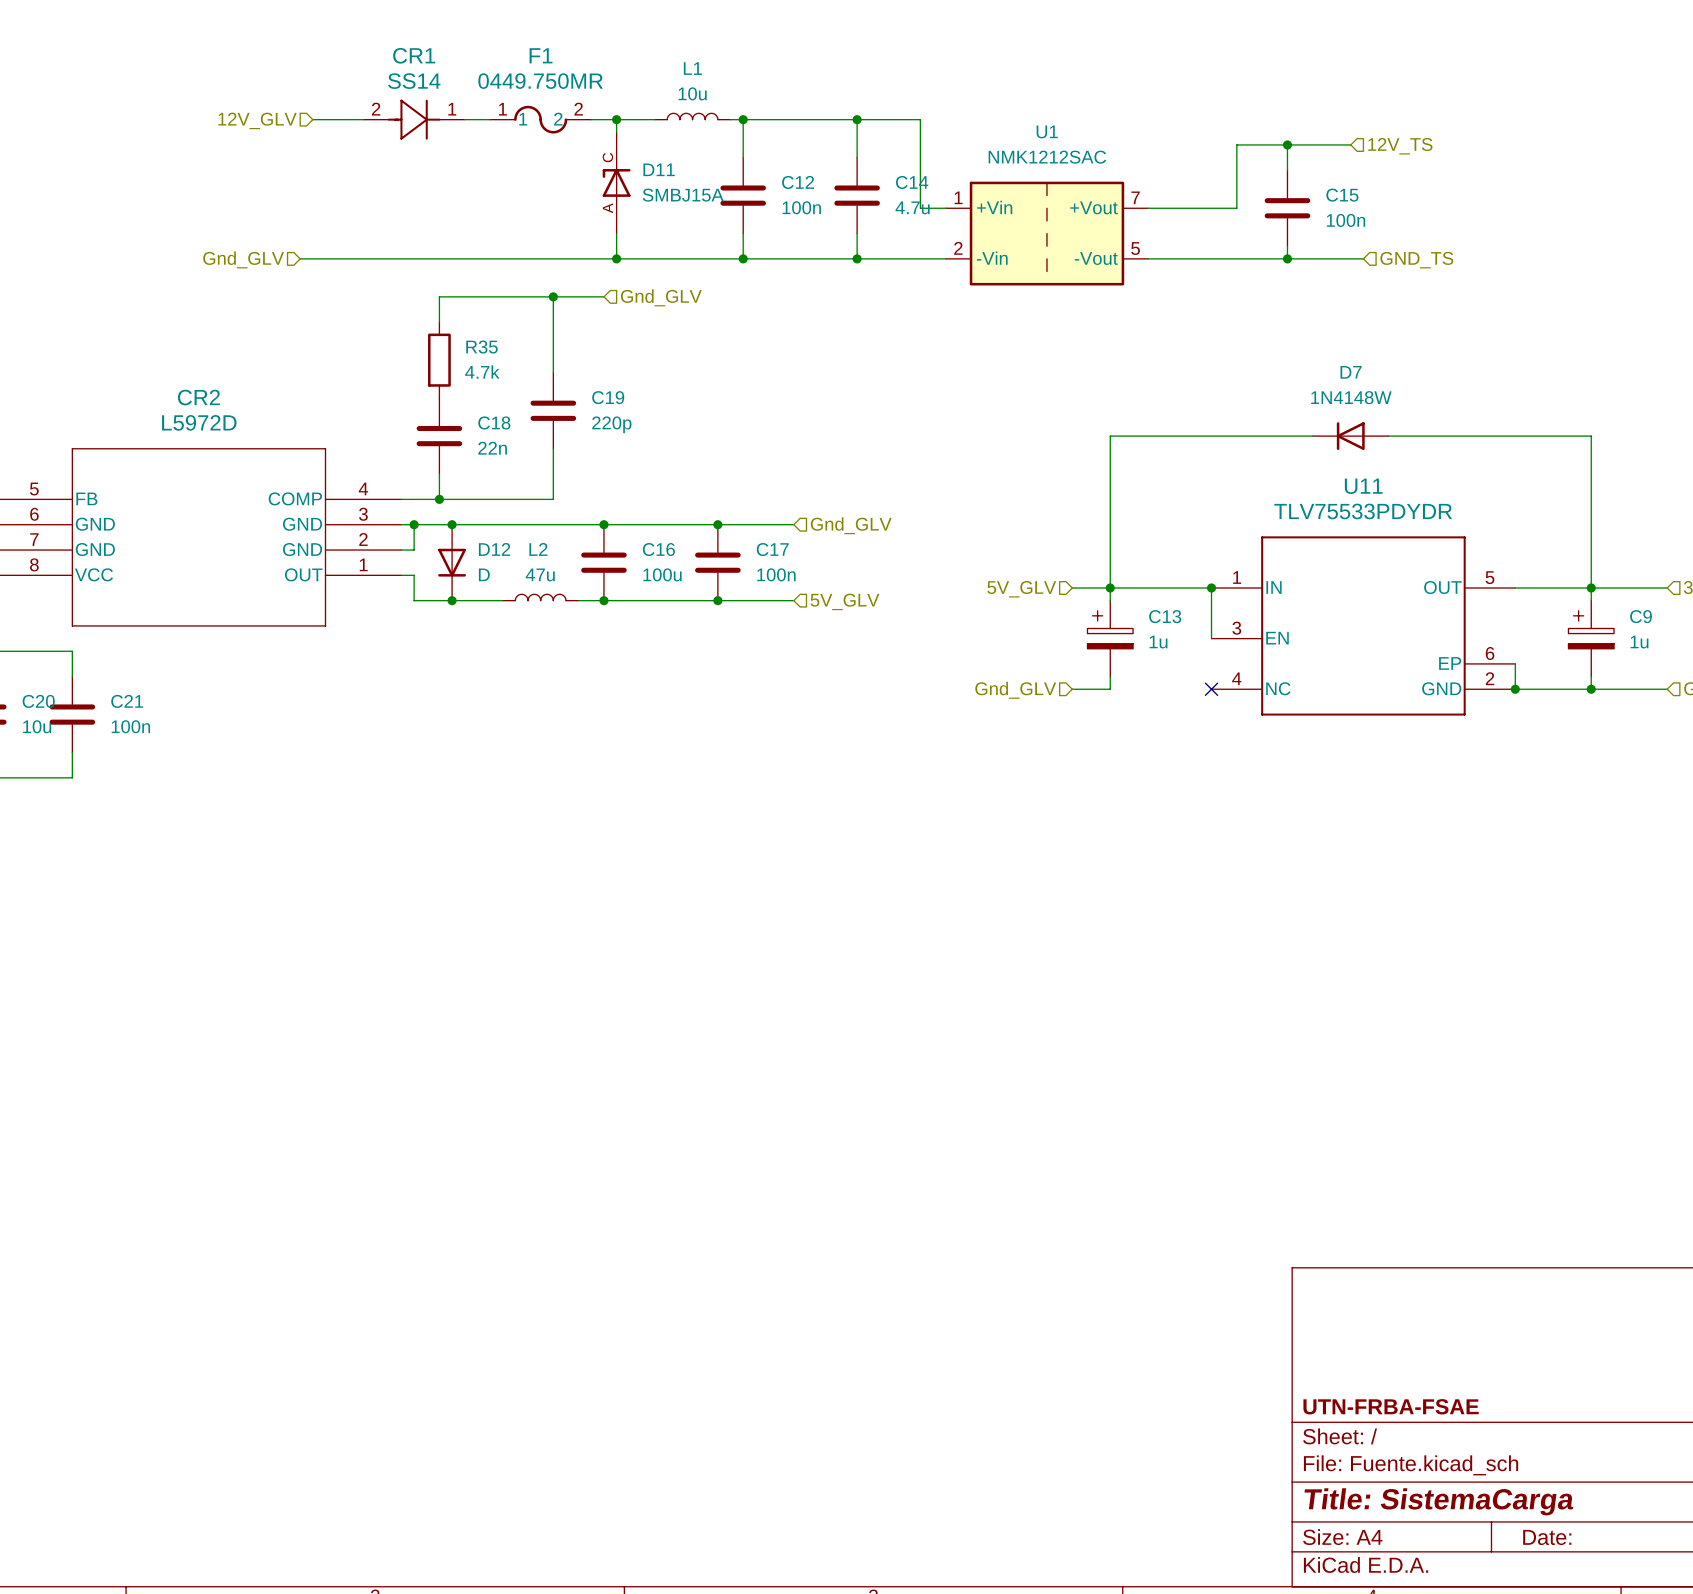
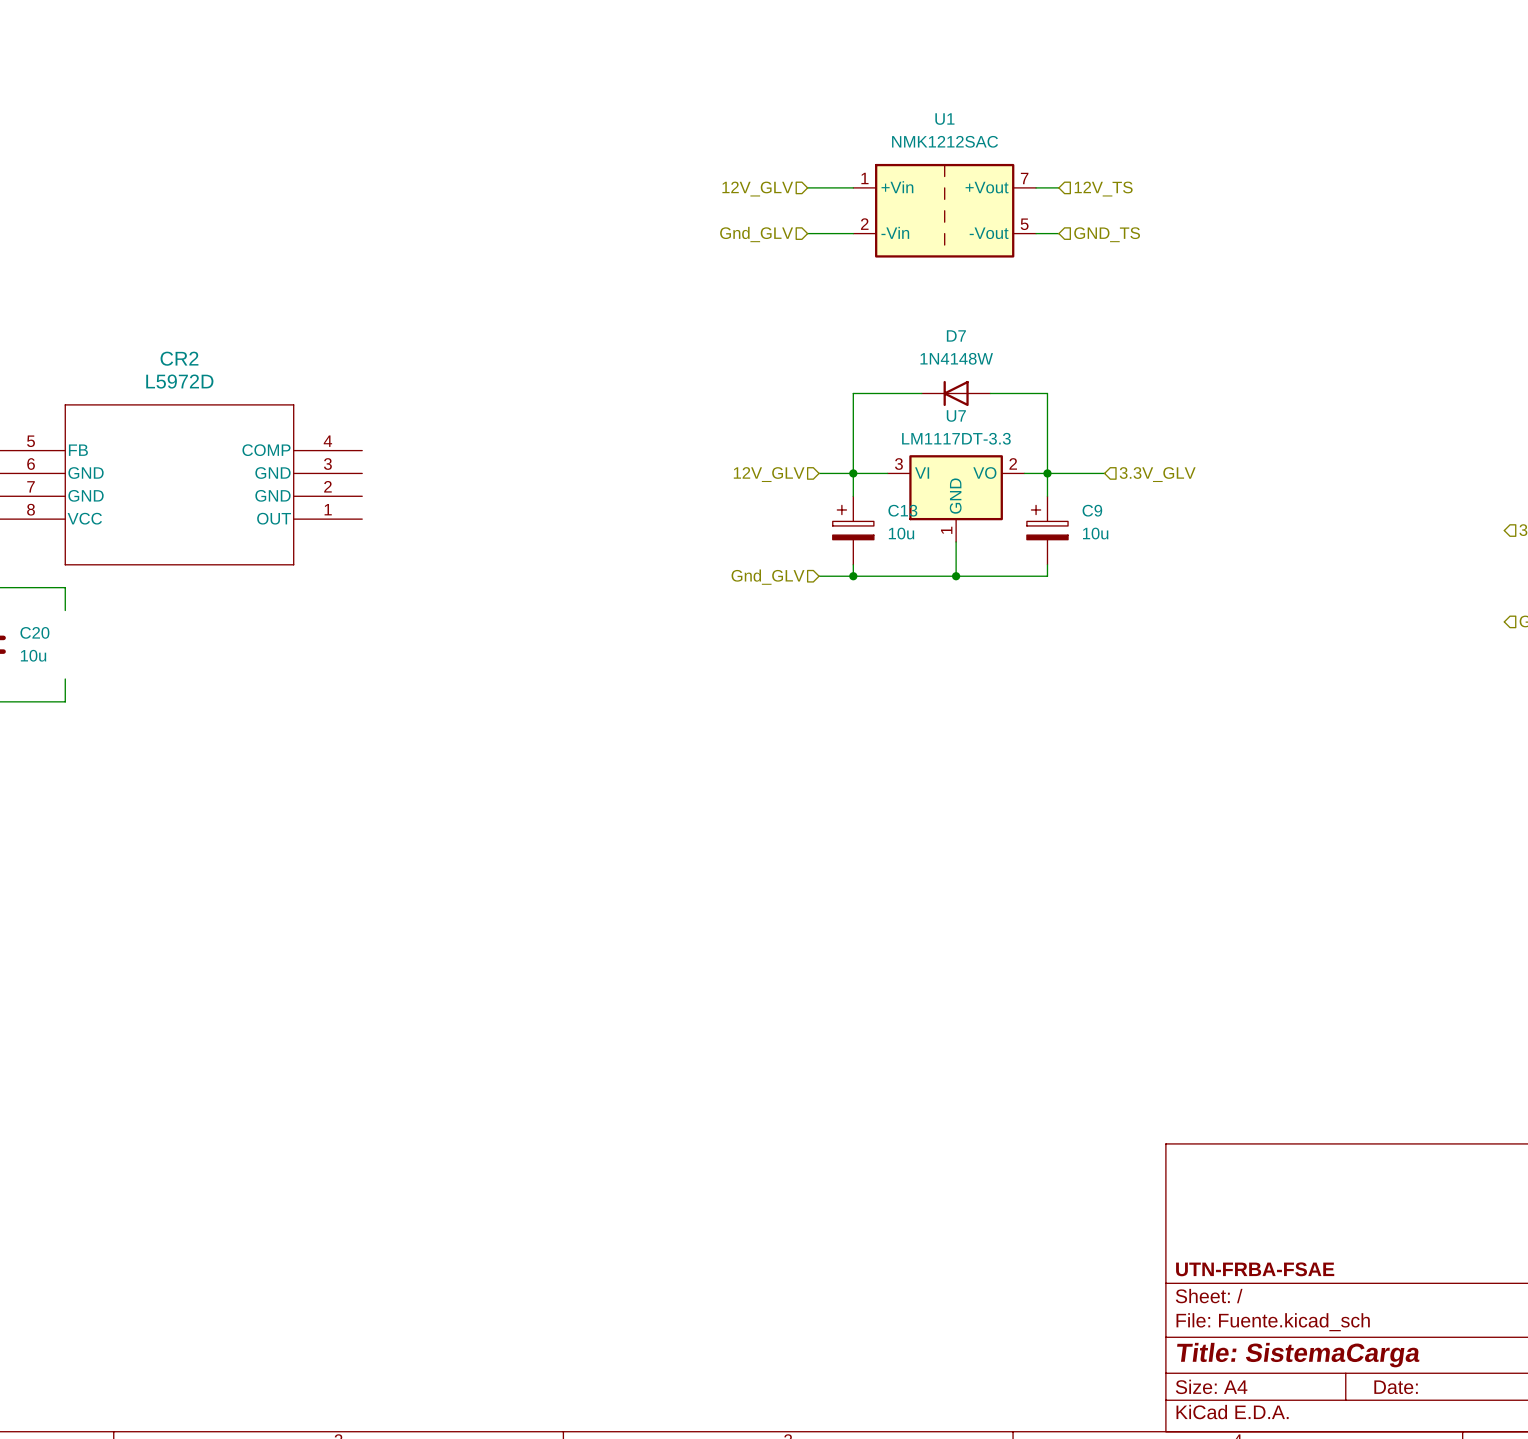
L1: 10u (692, 116) -> none
wire: (312, 119) (363, 119) -> none
CR1: SS14 (414, 119) -> none
wire: (464, 119) (490, 119) -> none
F1: 0449.750MR (540, 119) -> none
wire: (591, 119) (654, 119) -> none
wire: (616, 119) (616, 132) -> none
junction: (616, 119) -> none
wire: (730, 119) (920, 119) (920, 208) -> (807, 187) (830, 187)
wire: (743, 119) (743, 157) -> none
junction: (743, 119) -> none
wire: (857, 119) (857, 157) -> none
junction: (857, 119) -> none
hierarchical label: 12V_GLV (257, 120) -> none
wire: (1287, 144) (1287, 170) -> none
junction: (1287, 144) -> none
wire: (1350, 144) (1236, 144) (1236, 208) (1173, 208) -> none
hierarchical label position: 12V_TS (1400, 146) -> 12V_TS (1103, 189)
D11: SMBJ15A (616, 182) -> none
C12: 100n (743, 195) -> none
C14: 4.7u (857, 195) -> none
C15: 100n (1287, 208) -> none
hierarchical label: none -> 12V_GLV (757, 189)
wire: (616, 233) (616, 258) -> none
wire: (743, 233) (743, 258) -> none
wire: (857, 233) (857, 258) -> none
wire: (1287, 246) (1287, 258) -> none
wire: (300, 258) (895, 258) -> none
junction: (616, 258) -> none
junction: (743, 258) -> none
junction: (857, 258) -> none
wire: (1173, 258) (1363, 258) -> none
junction: (1287, 258) -> none
hierarchical label: Gnd_GLV (243, 259) -> none
hierarchical label: none -> Gnd_GLV (756, 234)
hierarchical label position: GND_TS (1416, 260) -> GND_TS (1107, 234)
wire: (553, 296) (553, 372) -> none
junction: (553, 296) -> none
wire: (603, 296) (439, 296) (439, 322) -> none
hierarchical label: Gnd_GLV (661, 297) -> none
R35: 4.7k (439, 360) -> none
C19: 220p (553, 410) -> none
C18: 22n (439, 436) -> none
wire: none -> (921, 393) (853, 393) (853, 496)
wire: (1110, 436) (1110, 600) -> (1001, 393) (990, 393)
wire: (1160, 436) (1312, 436) -> (1047, 393) (1047, 496)
D7 position: (1350, 436) -> (956, 393)
wire: (1388, 436) (1591, 436) (1591, 600) -> none
wire: (553, 448) (553, 499) (401, 499) -> none
wire: (439, 474) (439, 499) -> none
junction: (439, 499) -> none
wire: (401, 524) (793, 524) -> none
wire: (414, 524) (414, 550) (401, 550) -> none
junction: (414, 524) -> none
junction: (452, 524) -> none
junction: (603, 524) -> none
junction: (717, 524) -> none
wire: none -> (819, 473) (887, 473)
junction: none -> (853, 473)
wire: none -> (1024, 473) (1104, 473)
junction: none -> (1047, 473)
hierarchical label: Gnd_GLV (851, 525) -> none
hierarchical label: none -> 12V_GLV (769, 474)
hierarchical label: none -> 3.3V_GLV (1157, 474)
U7: none -> LM1117DT-3.3 (956, 498)
D12: D (452, 562) -> none
C16: 100u (603, 562) -> none
C17: 100n (717, 562) -> none
wire: (401, 575) (414, 575) (414, 600) (502, 600) -> none
wire: (1072, 587) (1211, 587) (1211, 638) -> none
junction: (1110, 587) -> none
junction: (1211, 587) -> none
wire: (1515, 587) (1667, 587) -> none
junction: (1591, 587) -> none
hierarchical label: 5V_GLV (1021, 589) -> none
L2: 47u (540, 597) -> none
junction: (452, 600) -> none
wire: (578, 600) (793, 600) -> none
junction: (603, 600) -> none
junction: (717, 600) -> none
wire: none -> (956, 541) (956, 576)
hierarchical label: 5V_GLV (845, 601) -> none
wire: none -> (853, 564) (853, 576)
wire: none -> (1047, 564) (1047, 576) (819, 576)
U11: TLV75533PDYDR (1363, 625) -> none
junction: none -> (853, 576)
junction: none -> (956, 576)
C13 position: (1110, 638) -> (853, 530)
C9 position: (1591, 638) -> (1047, 530)
hierarchical label: none -> Gnd_GLV (768, 577)
C13 value: 1u (1158, 642) -> 10u (901, 533)
C9 value: 1u (1639, 642) -> 10u (1095, 533)
wire: (1515, 663) (1515, 689) (1667, 689) -> none
wire: (1110, 676) (1110, 689) (1072, 689) -> none
wire: (1591, 676) (1591, 689) -> none
no-connect mark: (1211, 689) -> none
junction: (1515, 689) -> none
junction: (1591, 689) -> none
hierarchical label: Gnd_GLV (1015, 690) -> none
C21: 100n (72, 714) -> none

